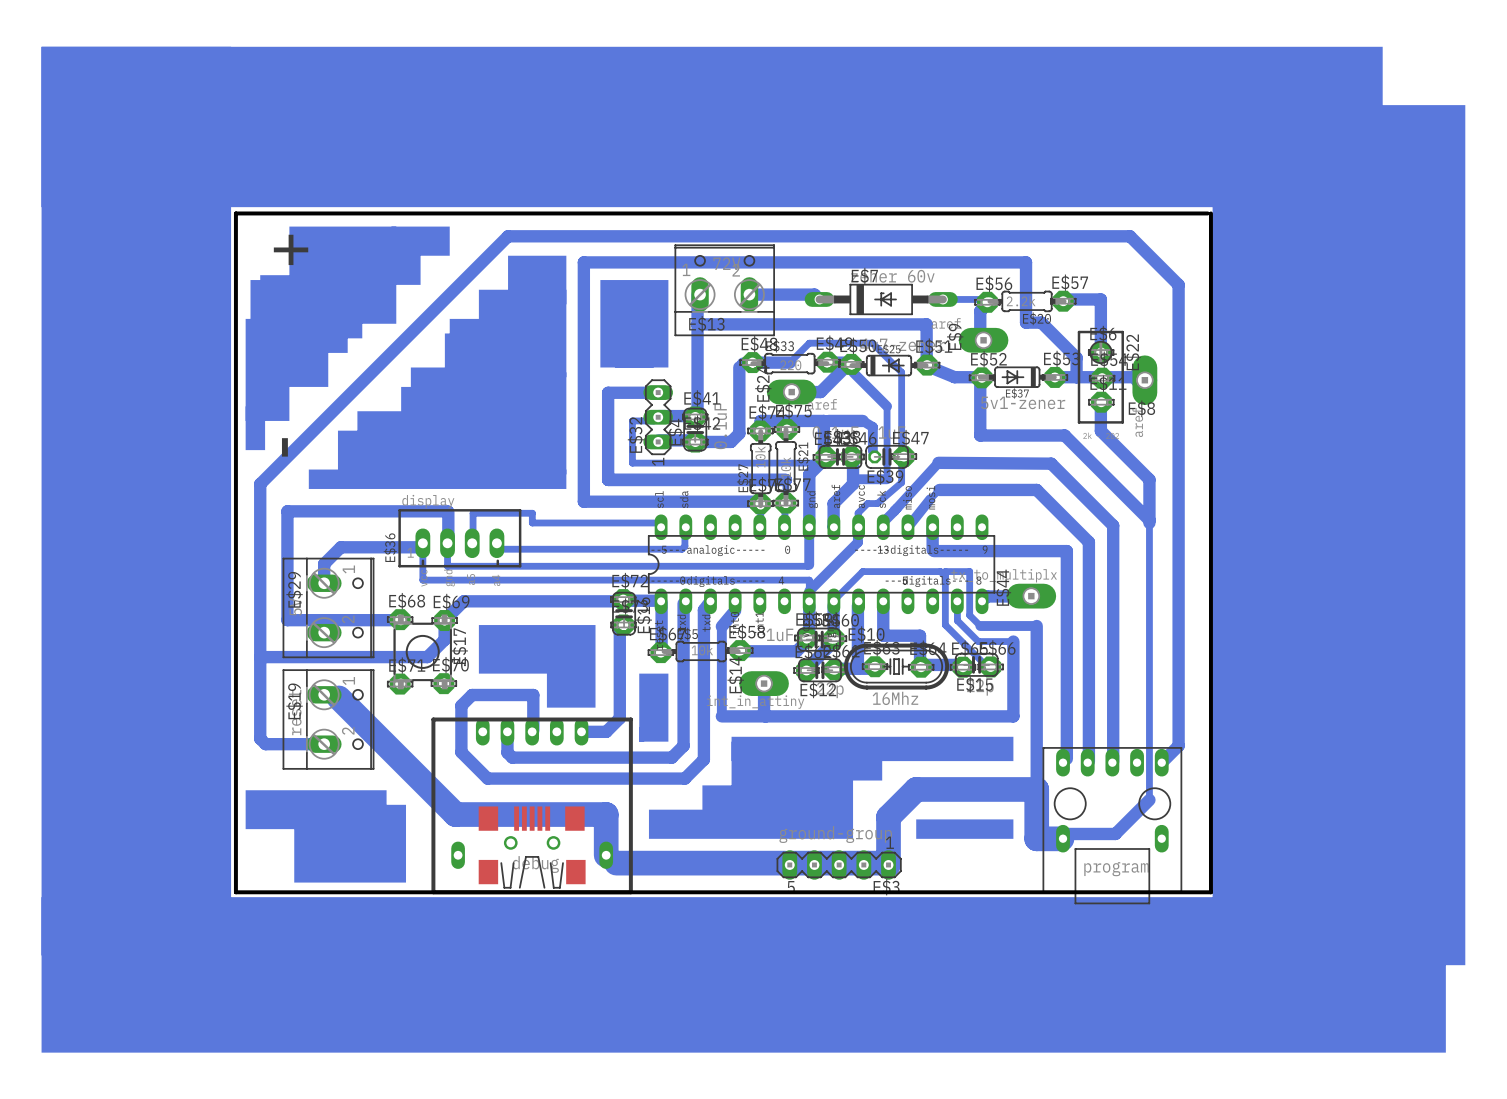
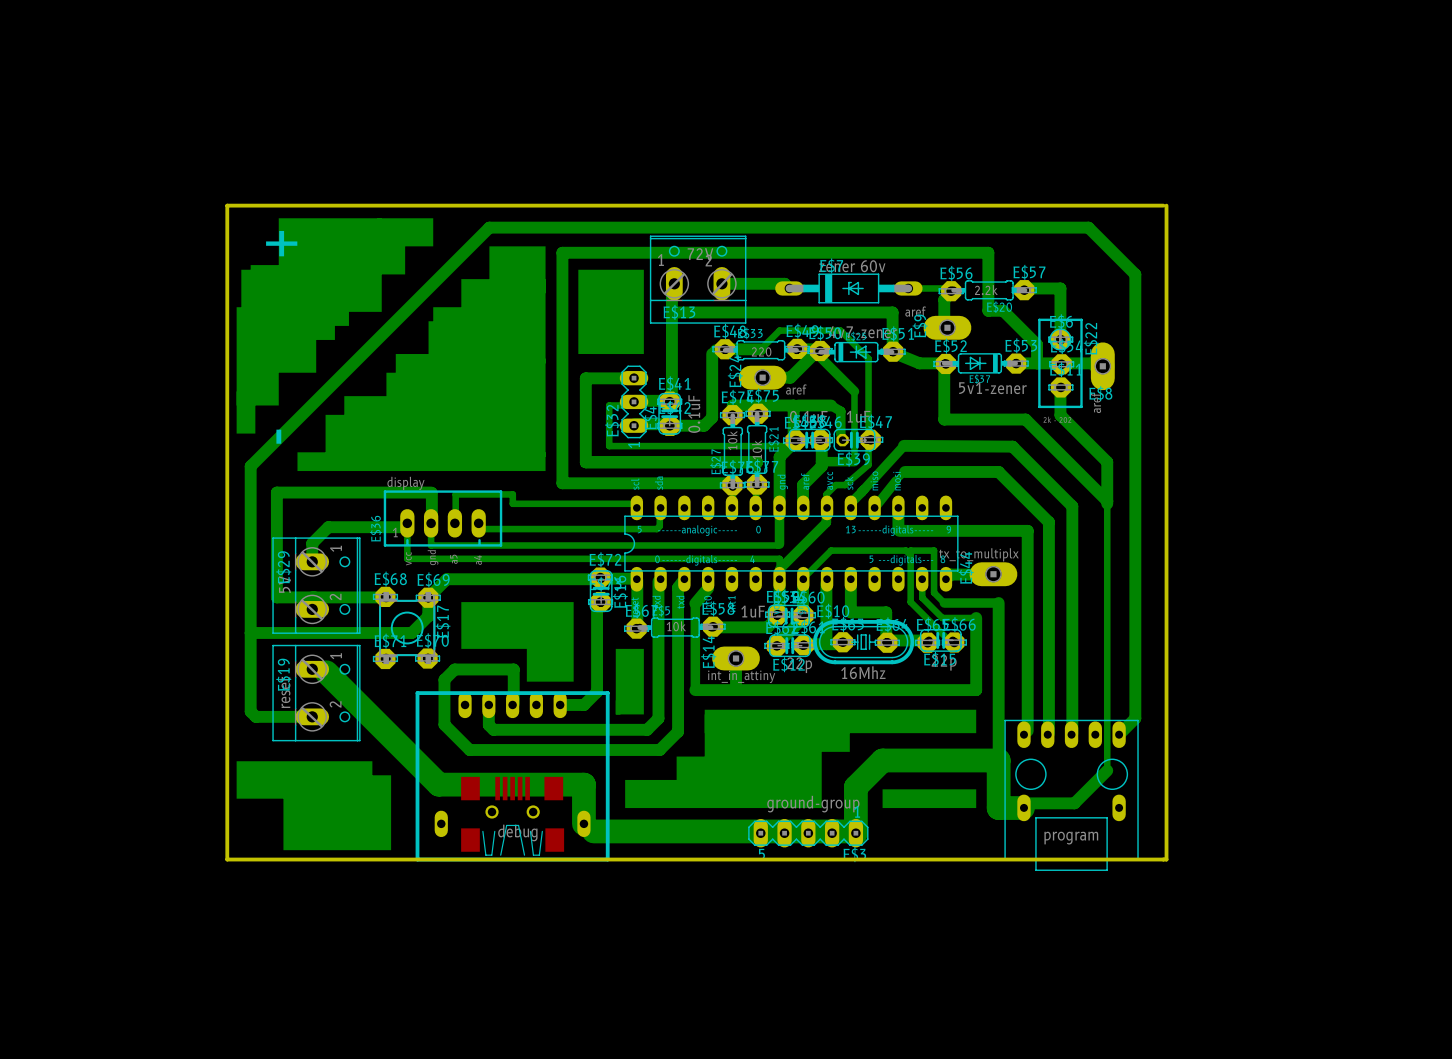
drawing: [41, 46, 1466, 1053] -> none

